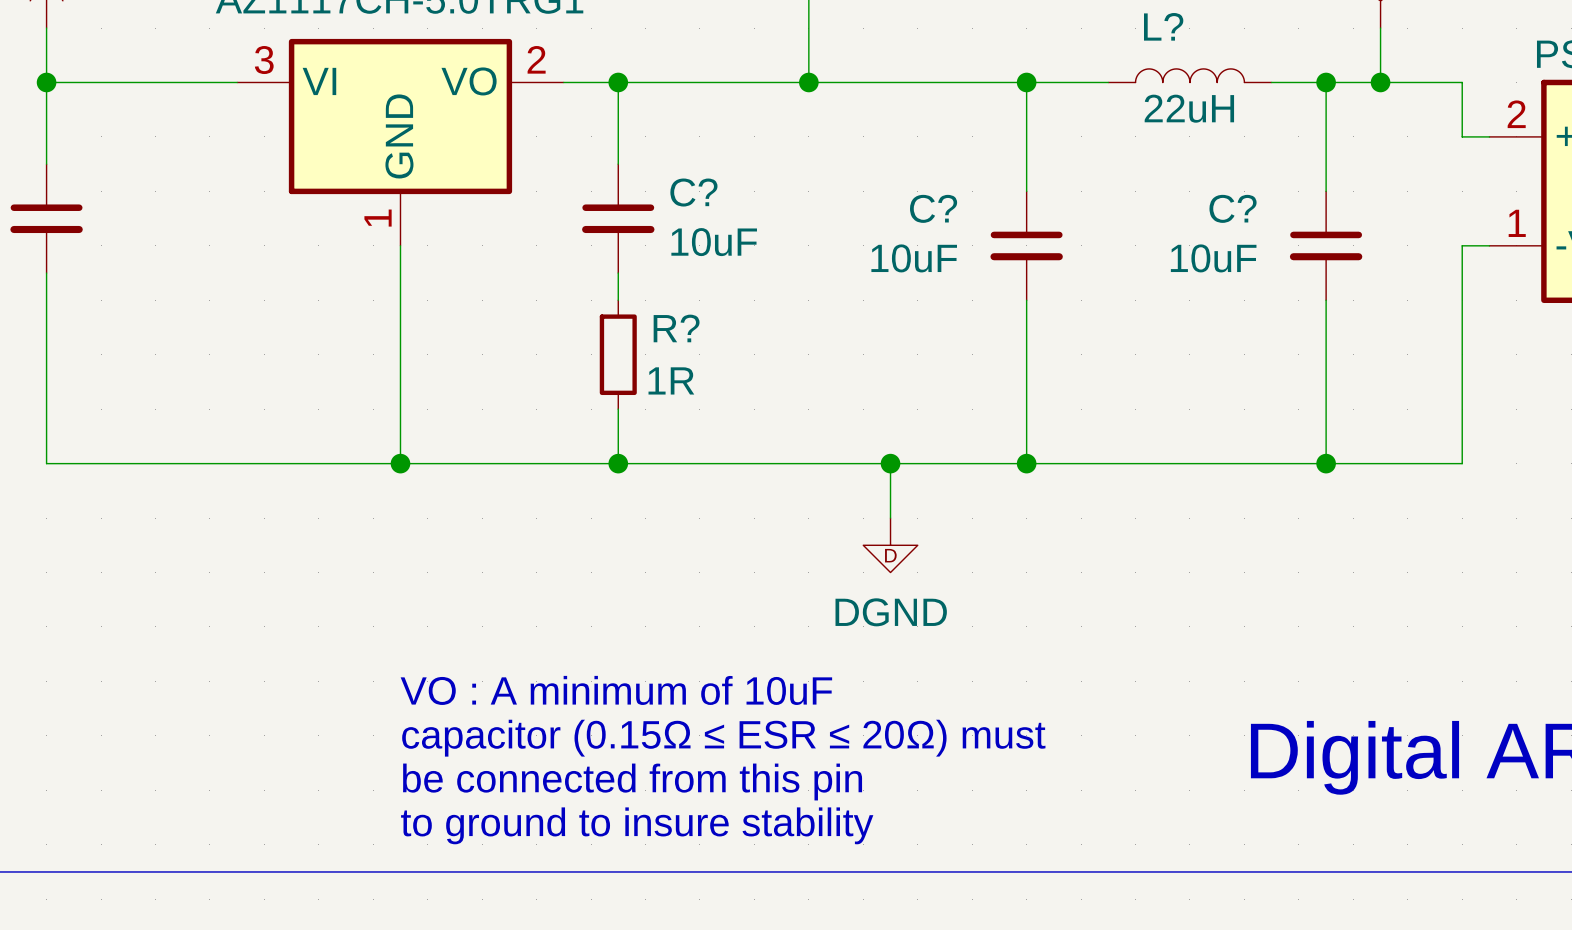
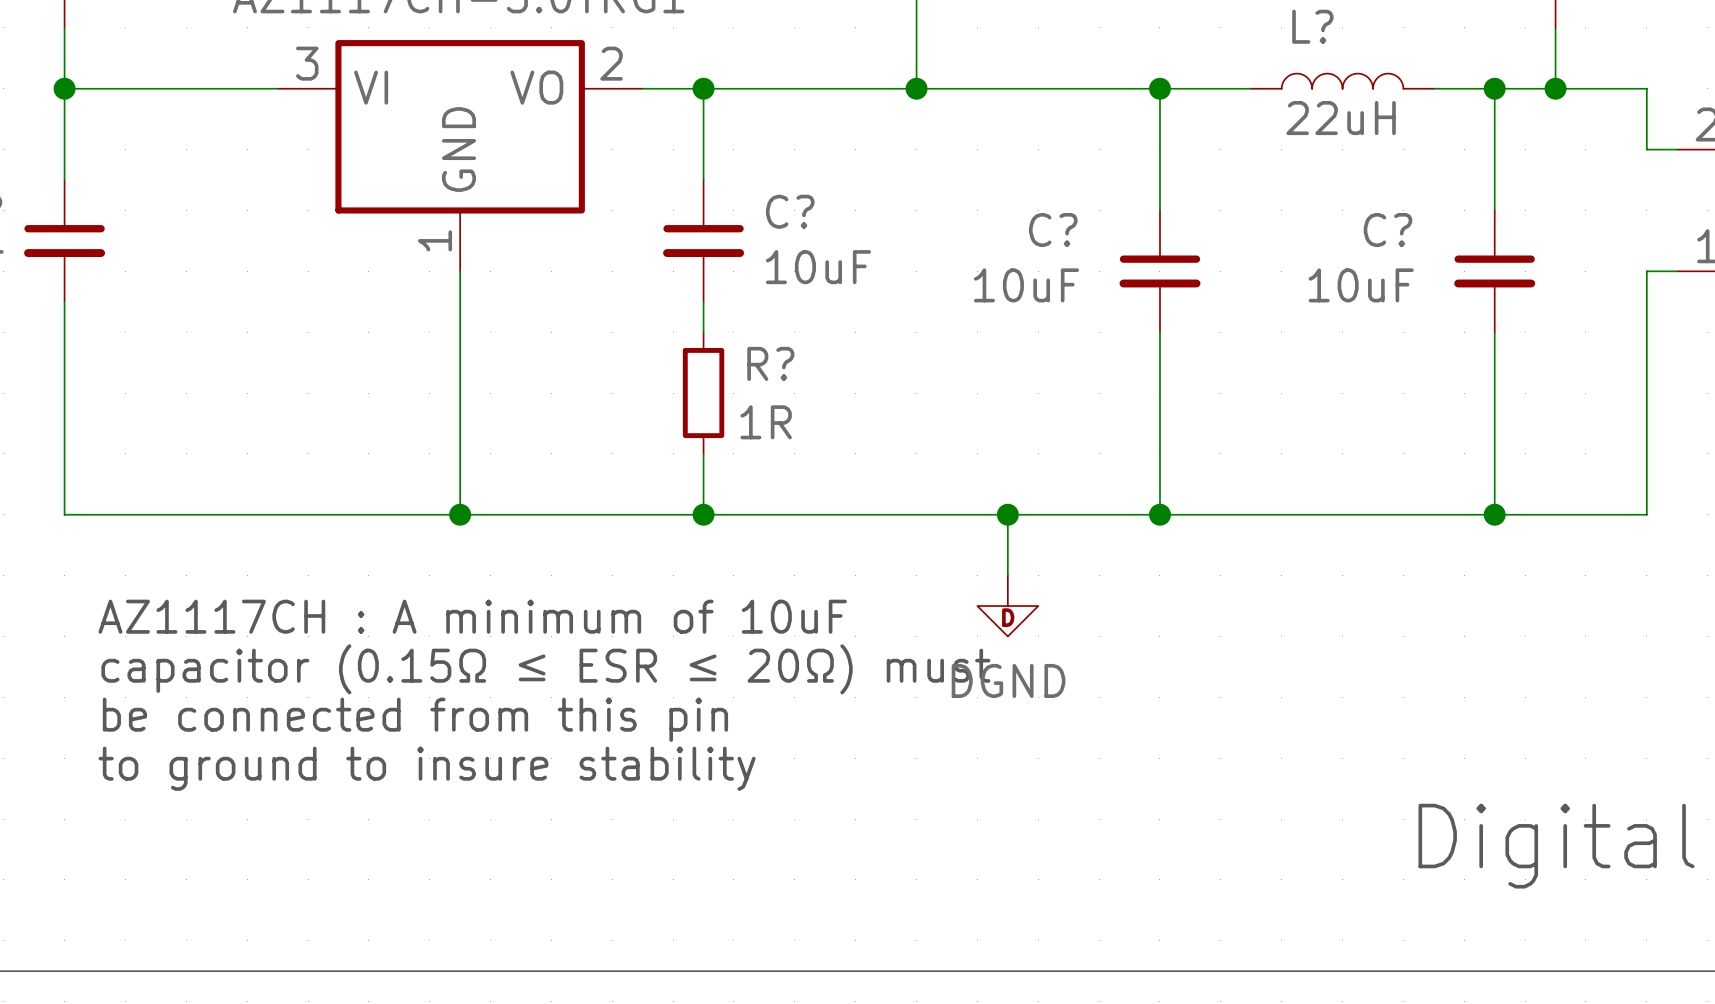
text: none -> AZ1117CH : A minimum of 10uF (472, 616)
text: VO : A minimum of 10uF (616, 690) -> none
text position: capacitor (0.15Ω ≤ ESR ≤ 20Ω) must (723, 738) -> capacitor (0.15Ω ≤ ESR ≤ 20Ω) must (545, 669)
text position: be connected from this pin (632, 782) -> be connected from this pin (415, 719)
text position: to ground to insure stability (637, 825) -> to ground to insure stability (427, 768)

